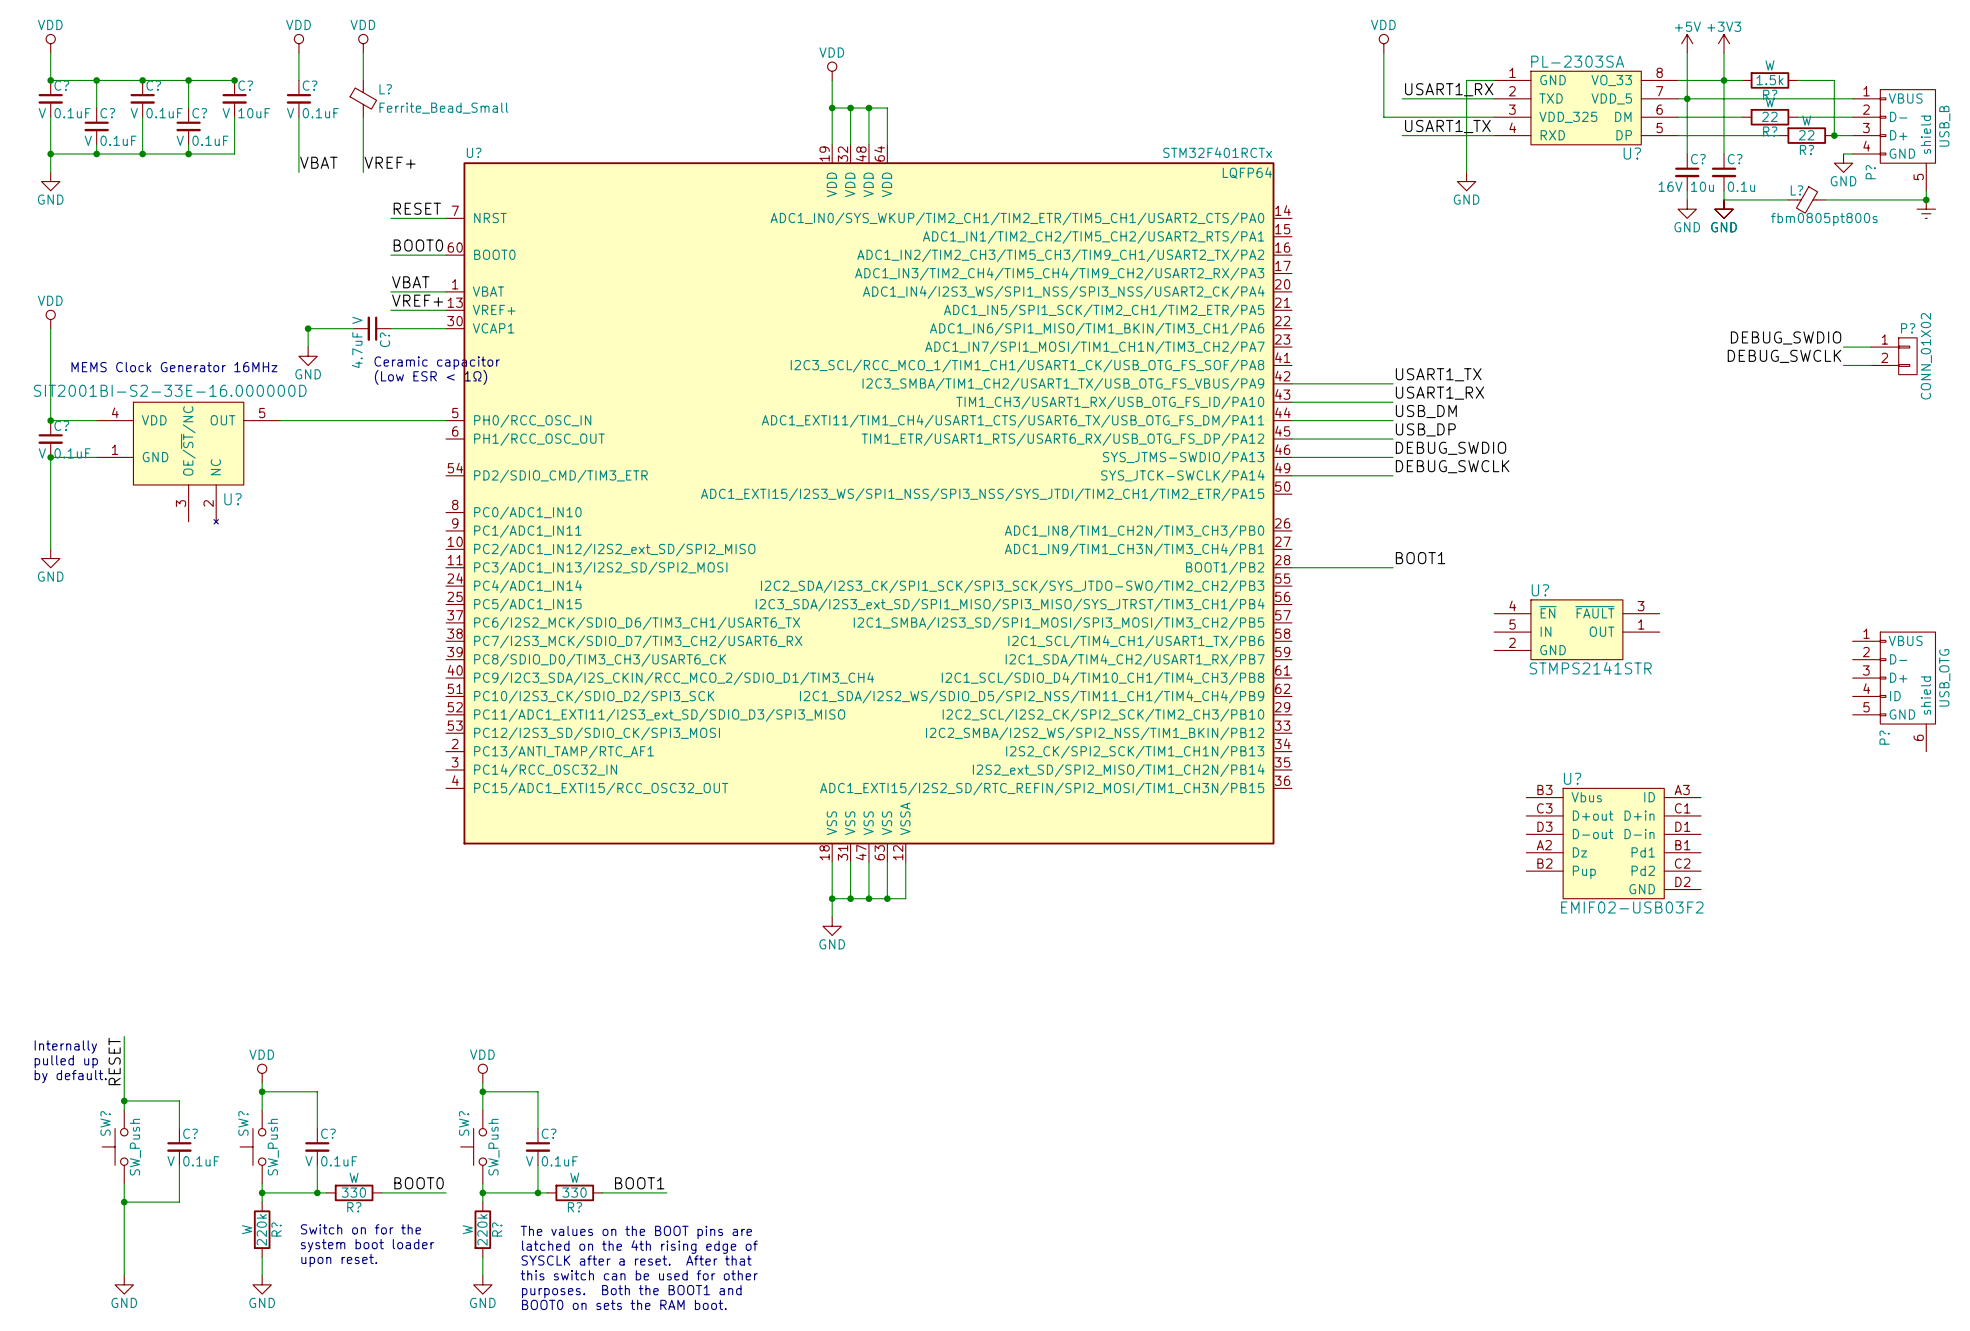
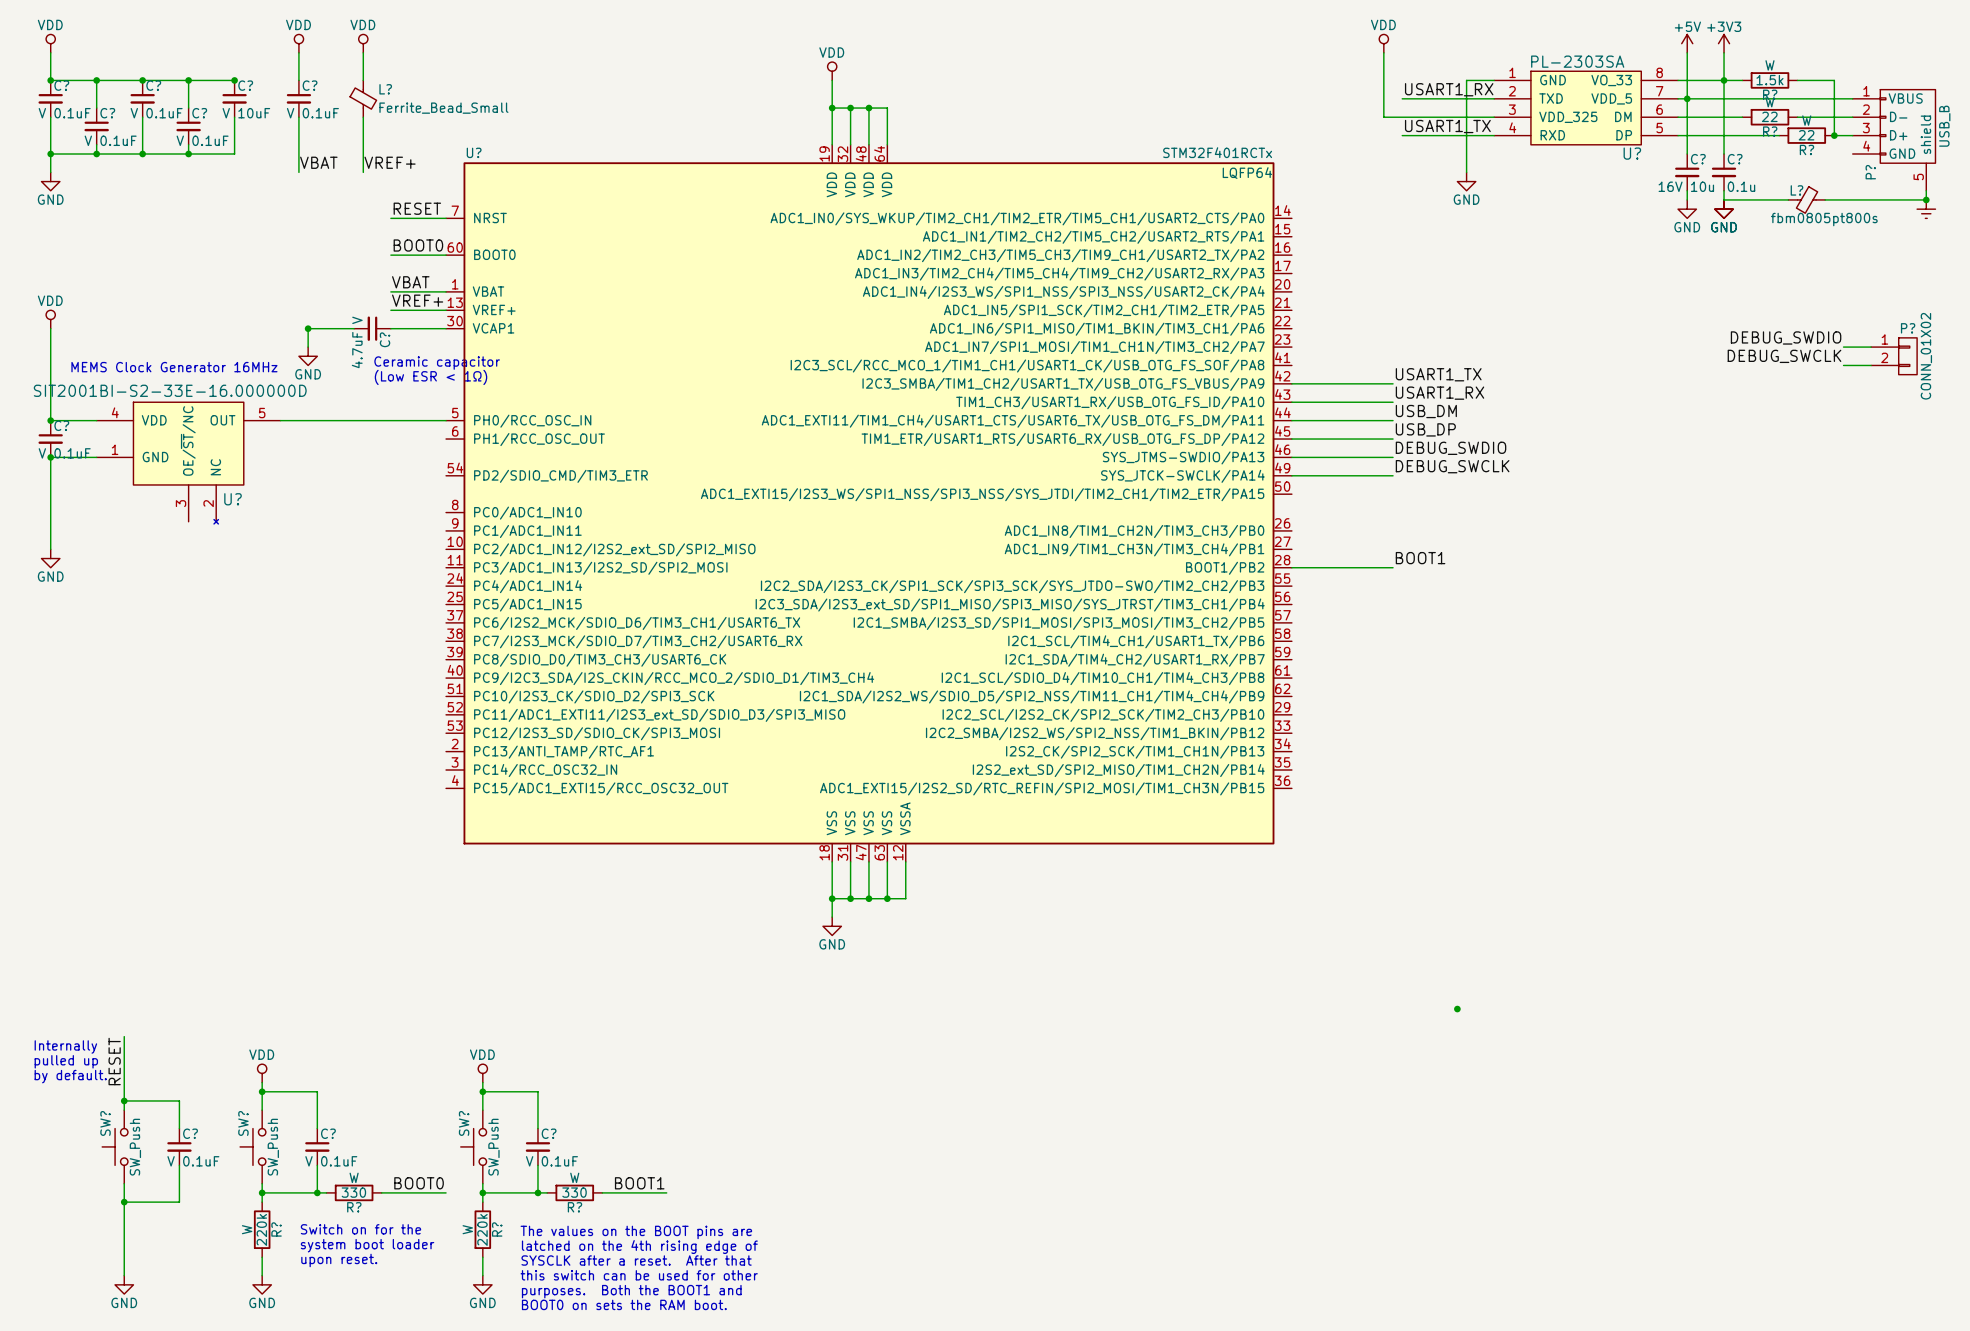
wire: (1843, 154) (1852, 154) -> none
power symbol: GND (1843, 163) -> none
U?: STMPS2141STR (1576, 629) -> none
P?: USB_OTG (1894, 691) -> none
U?: EMIF02-USB03F2 (1613, 843) -> none
junction: none -> (1457, 1009)

